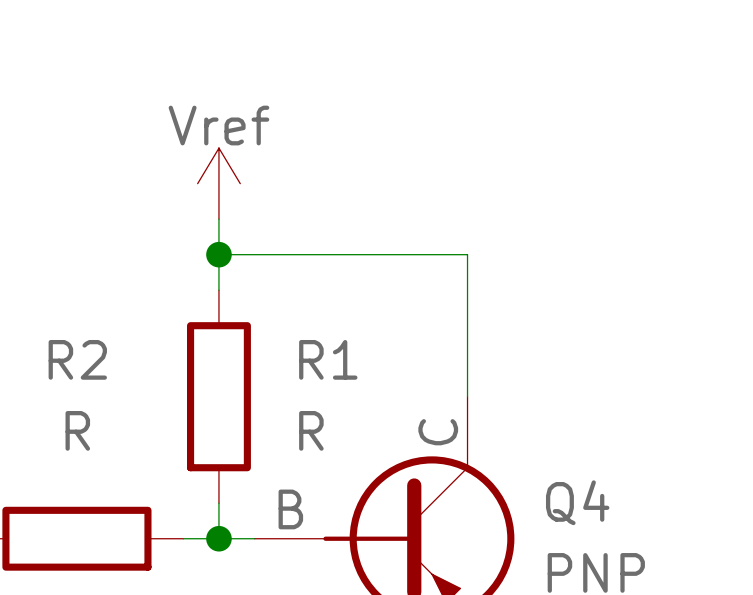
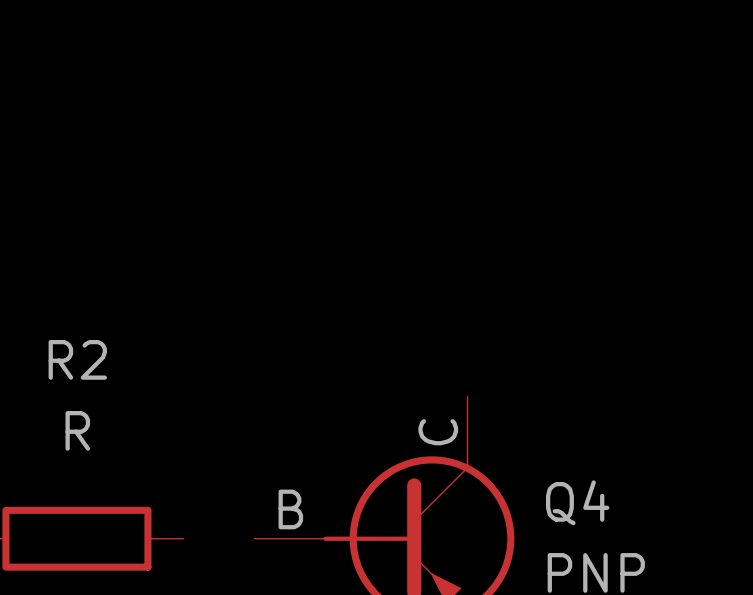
power symbol: Vref (218, 183) -> none
wire: (218, 219) (218, 290) -> none
wire: (218, 254) (467, 254) (467, 396) -> none
junction: (218, 254) -> none
R1: R (218, 396) -> none
wire: (218, 503) (218, 538) -> none
wire: (183, 538) (254, 538) -> none
junction: (218, 538) -> none

